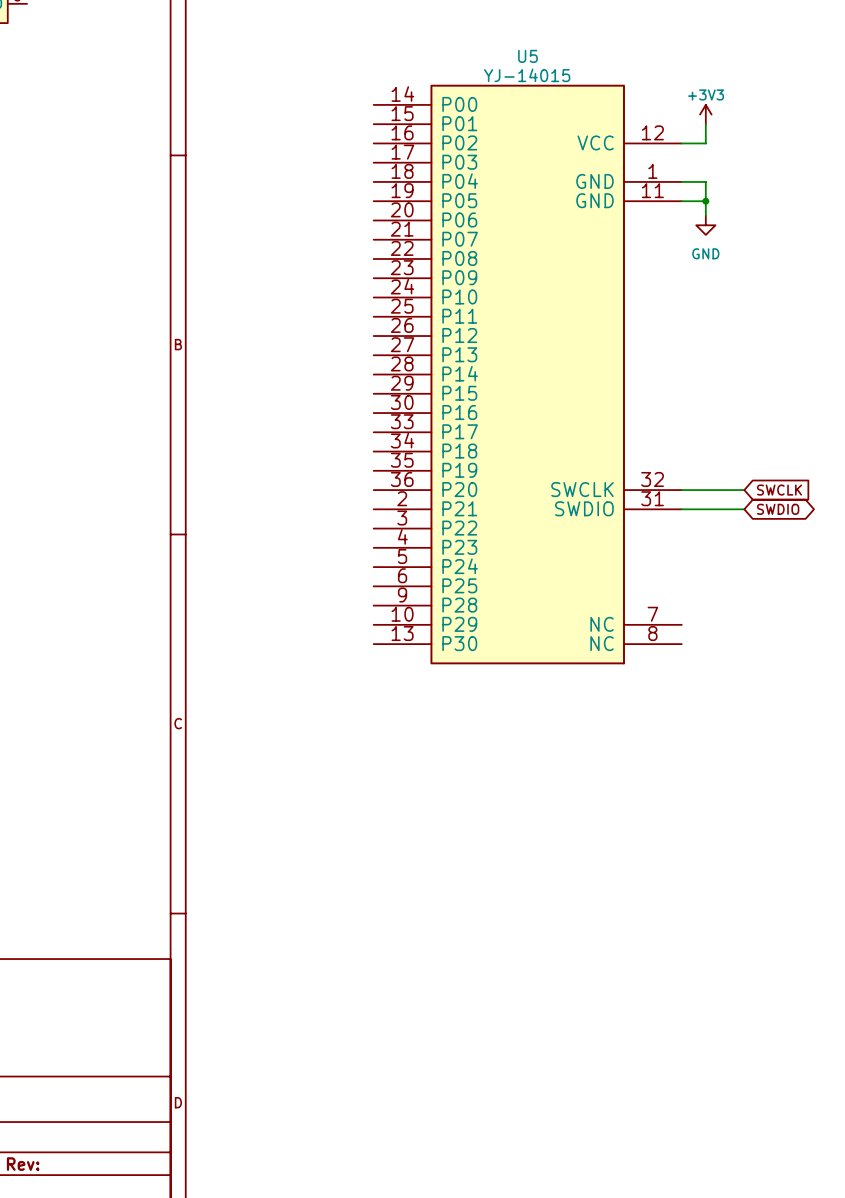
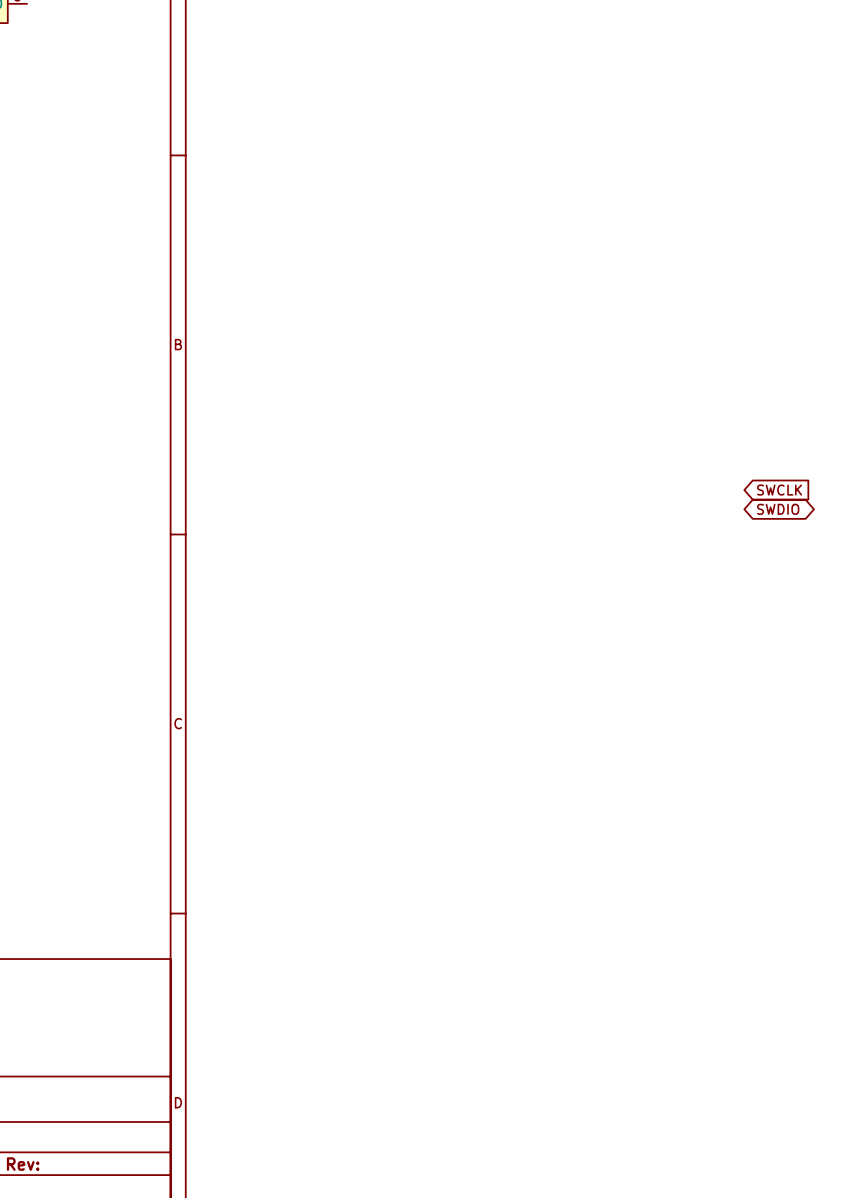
power symbol: +3V3 (705, 114) -> none
wire: (705, 124) (705, 143) (681, 143) -> none
wire: (681, 181) (705, 181) (705, 215) -> none
wire: (681, 201) (705, 201) -> none
junction: (705, 201) -> none
power symbol: GND (705, 225) -> none
U5: YJ-14015 (527, 374) -> none
wire: (681, 490) (744, 490) -> none
wire: (681, 509) (744, 509) -> none

